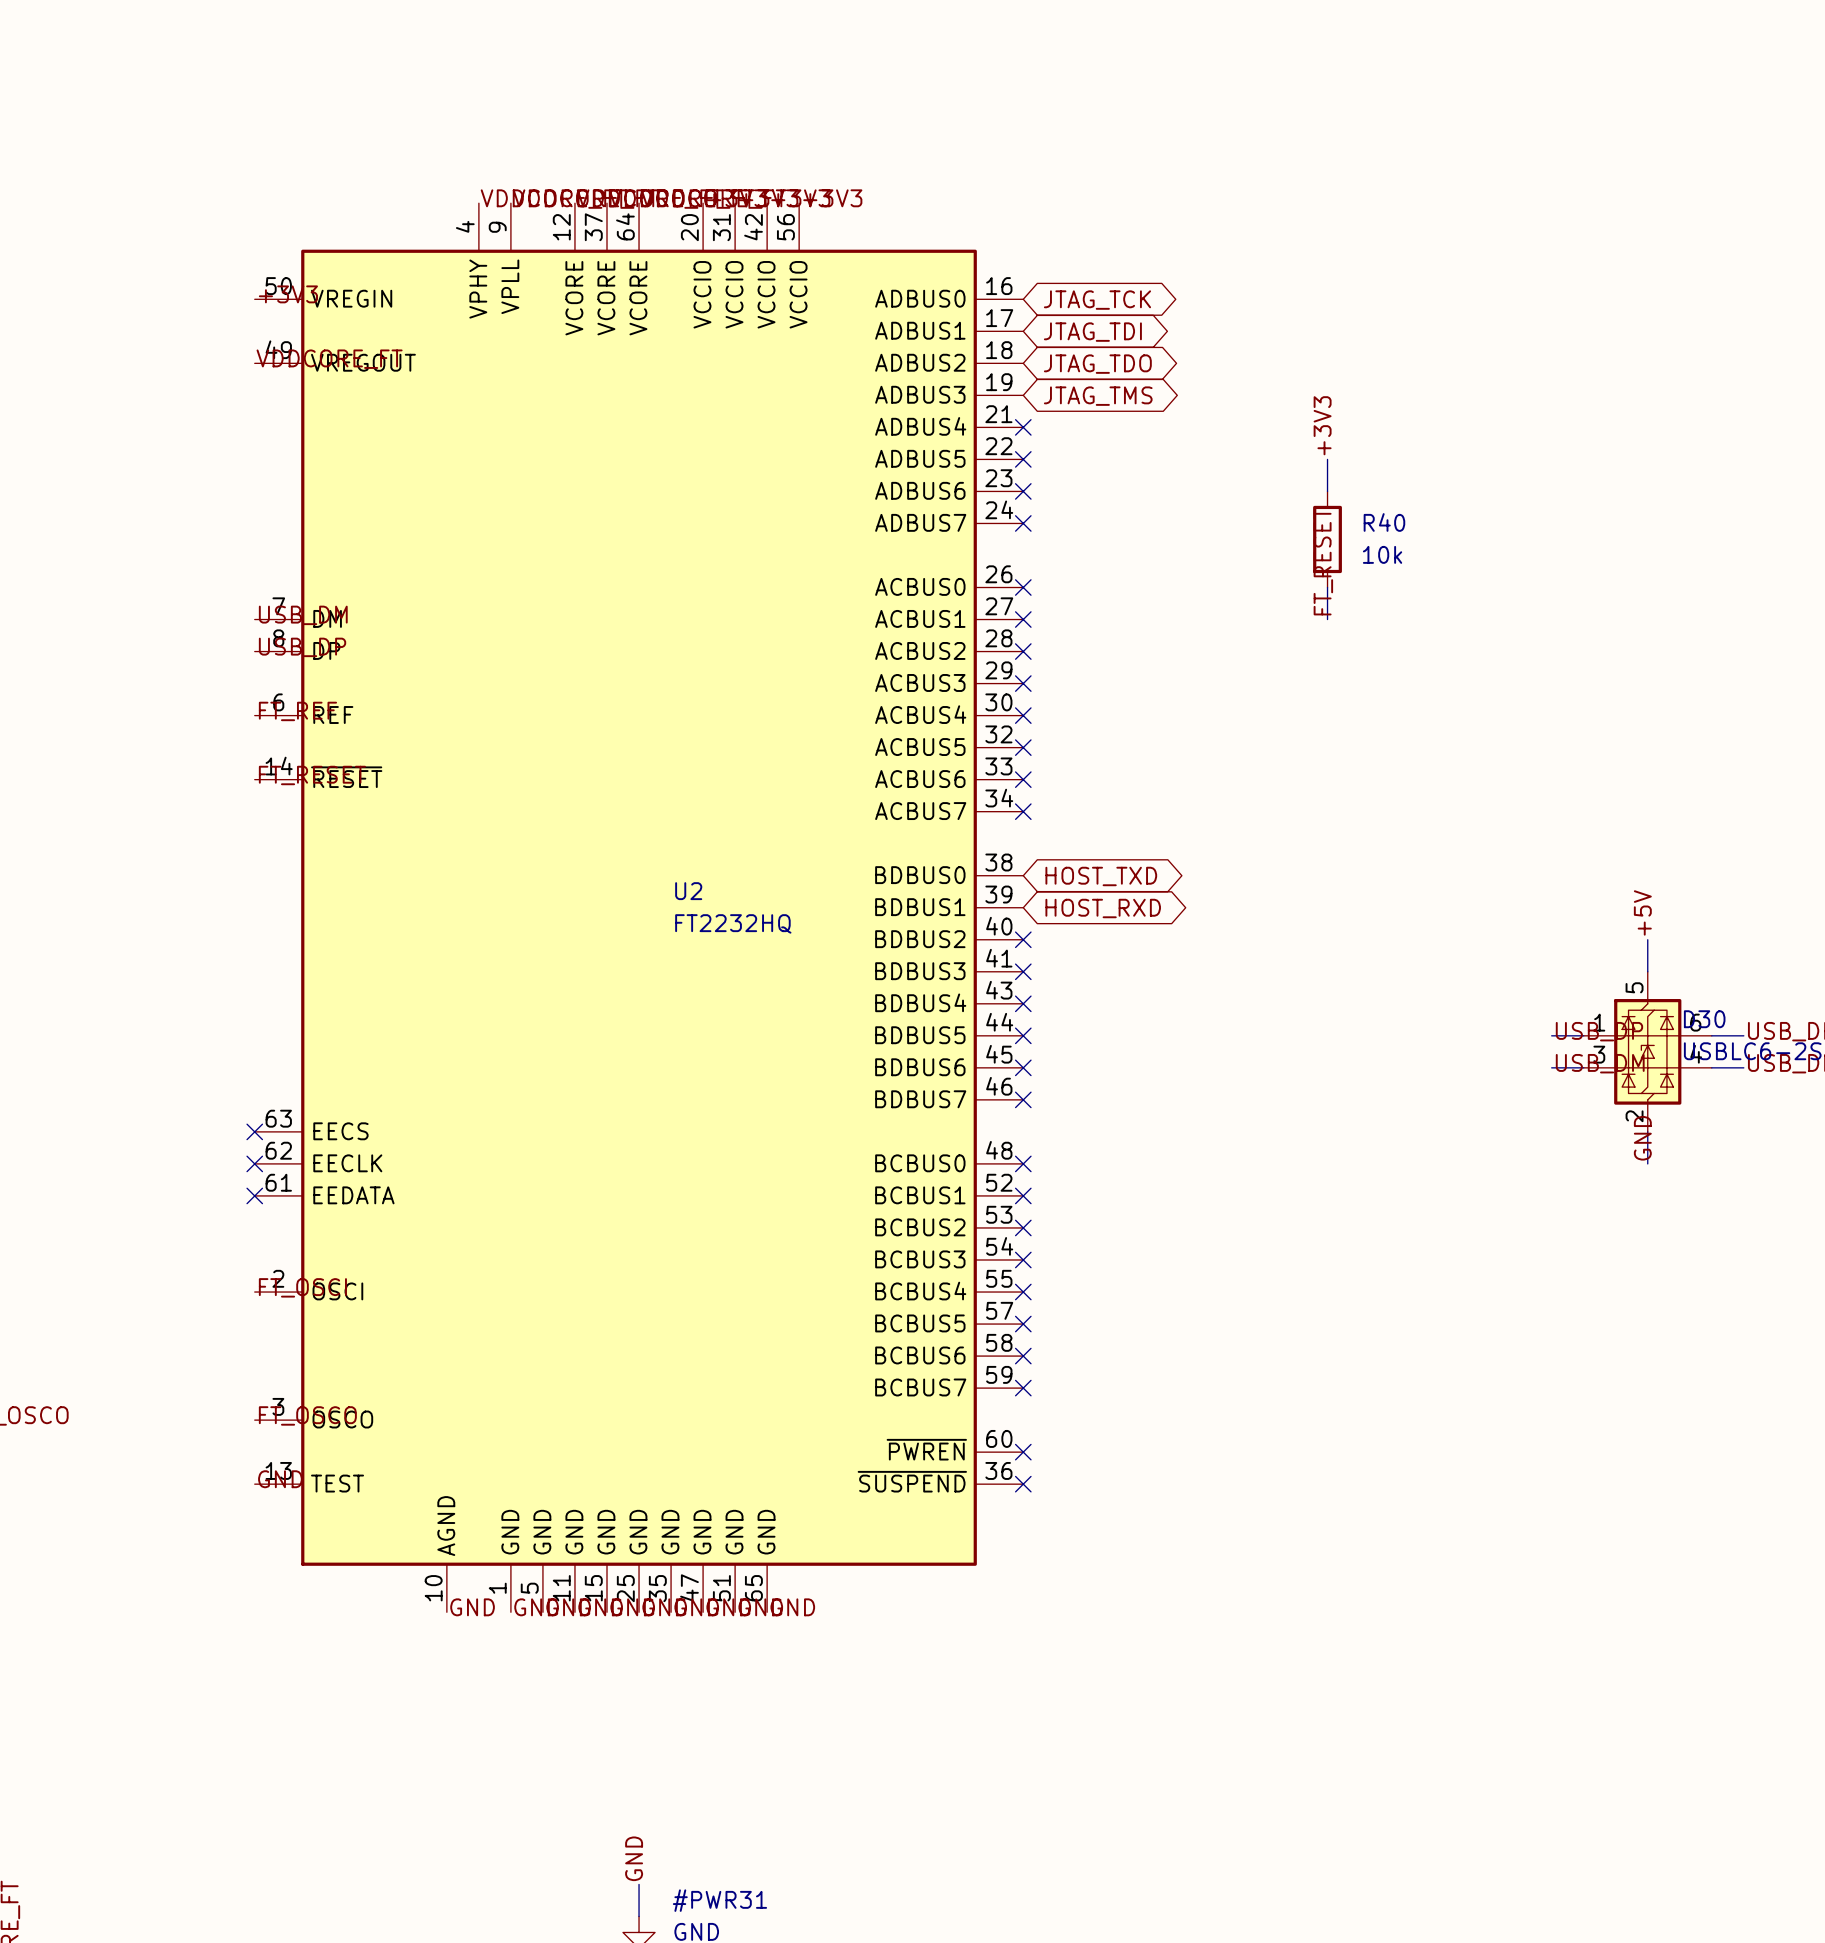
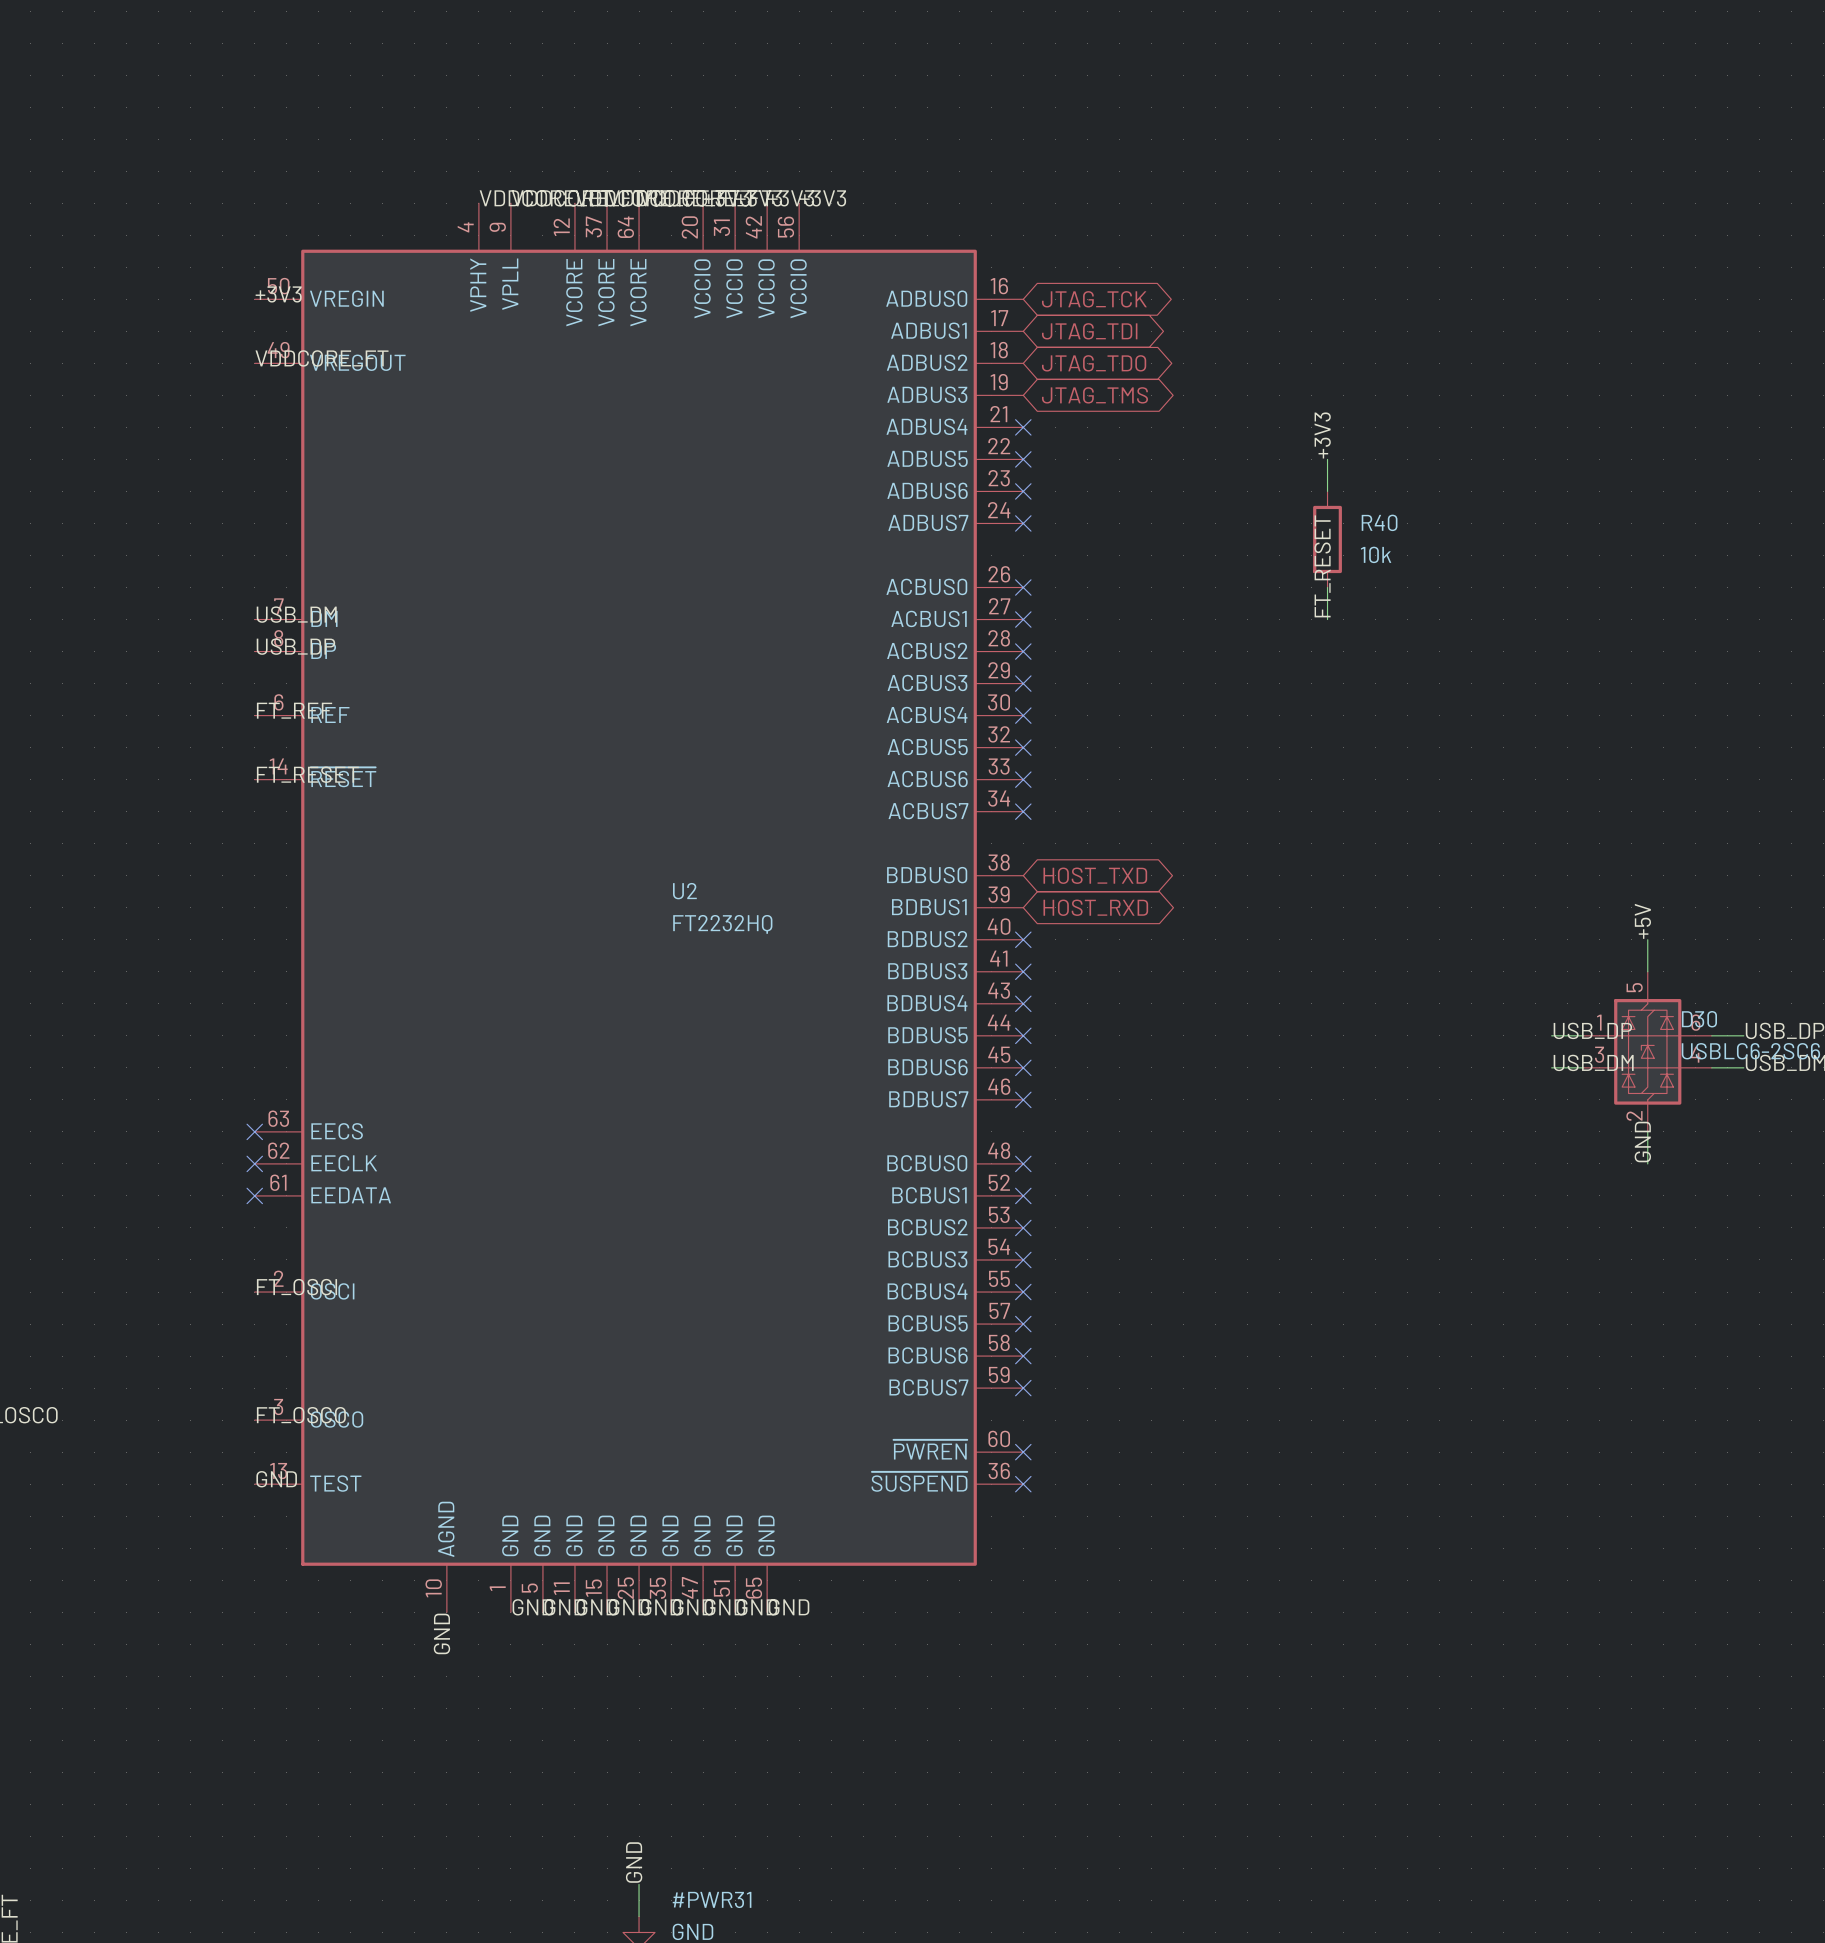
label rotation: 0° (472, 1607) -> 90° counterclockwise (441, 1633)

